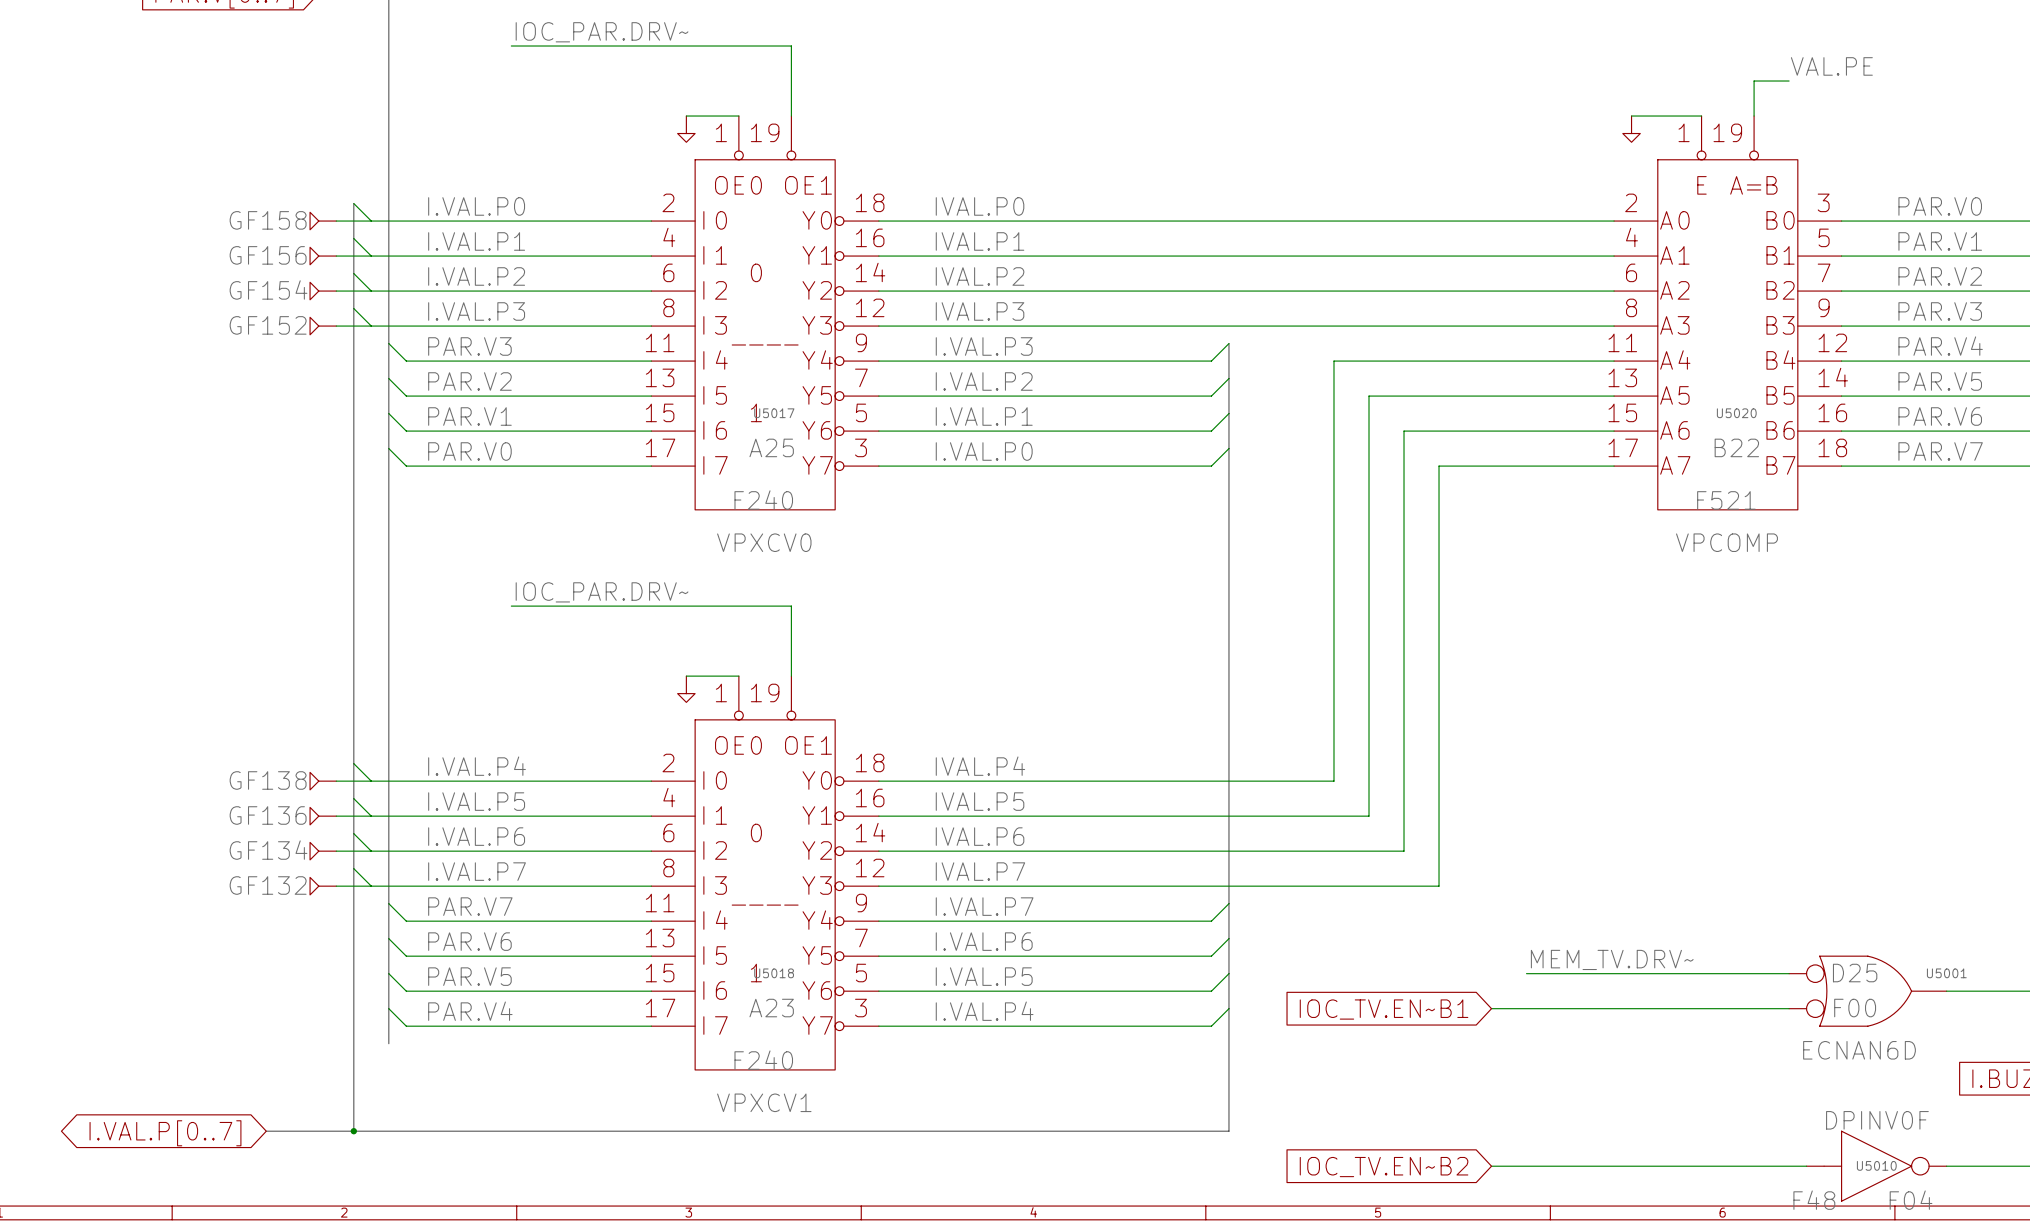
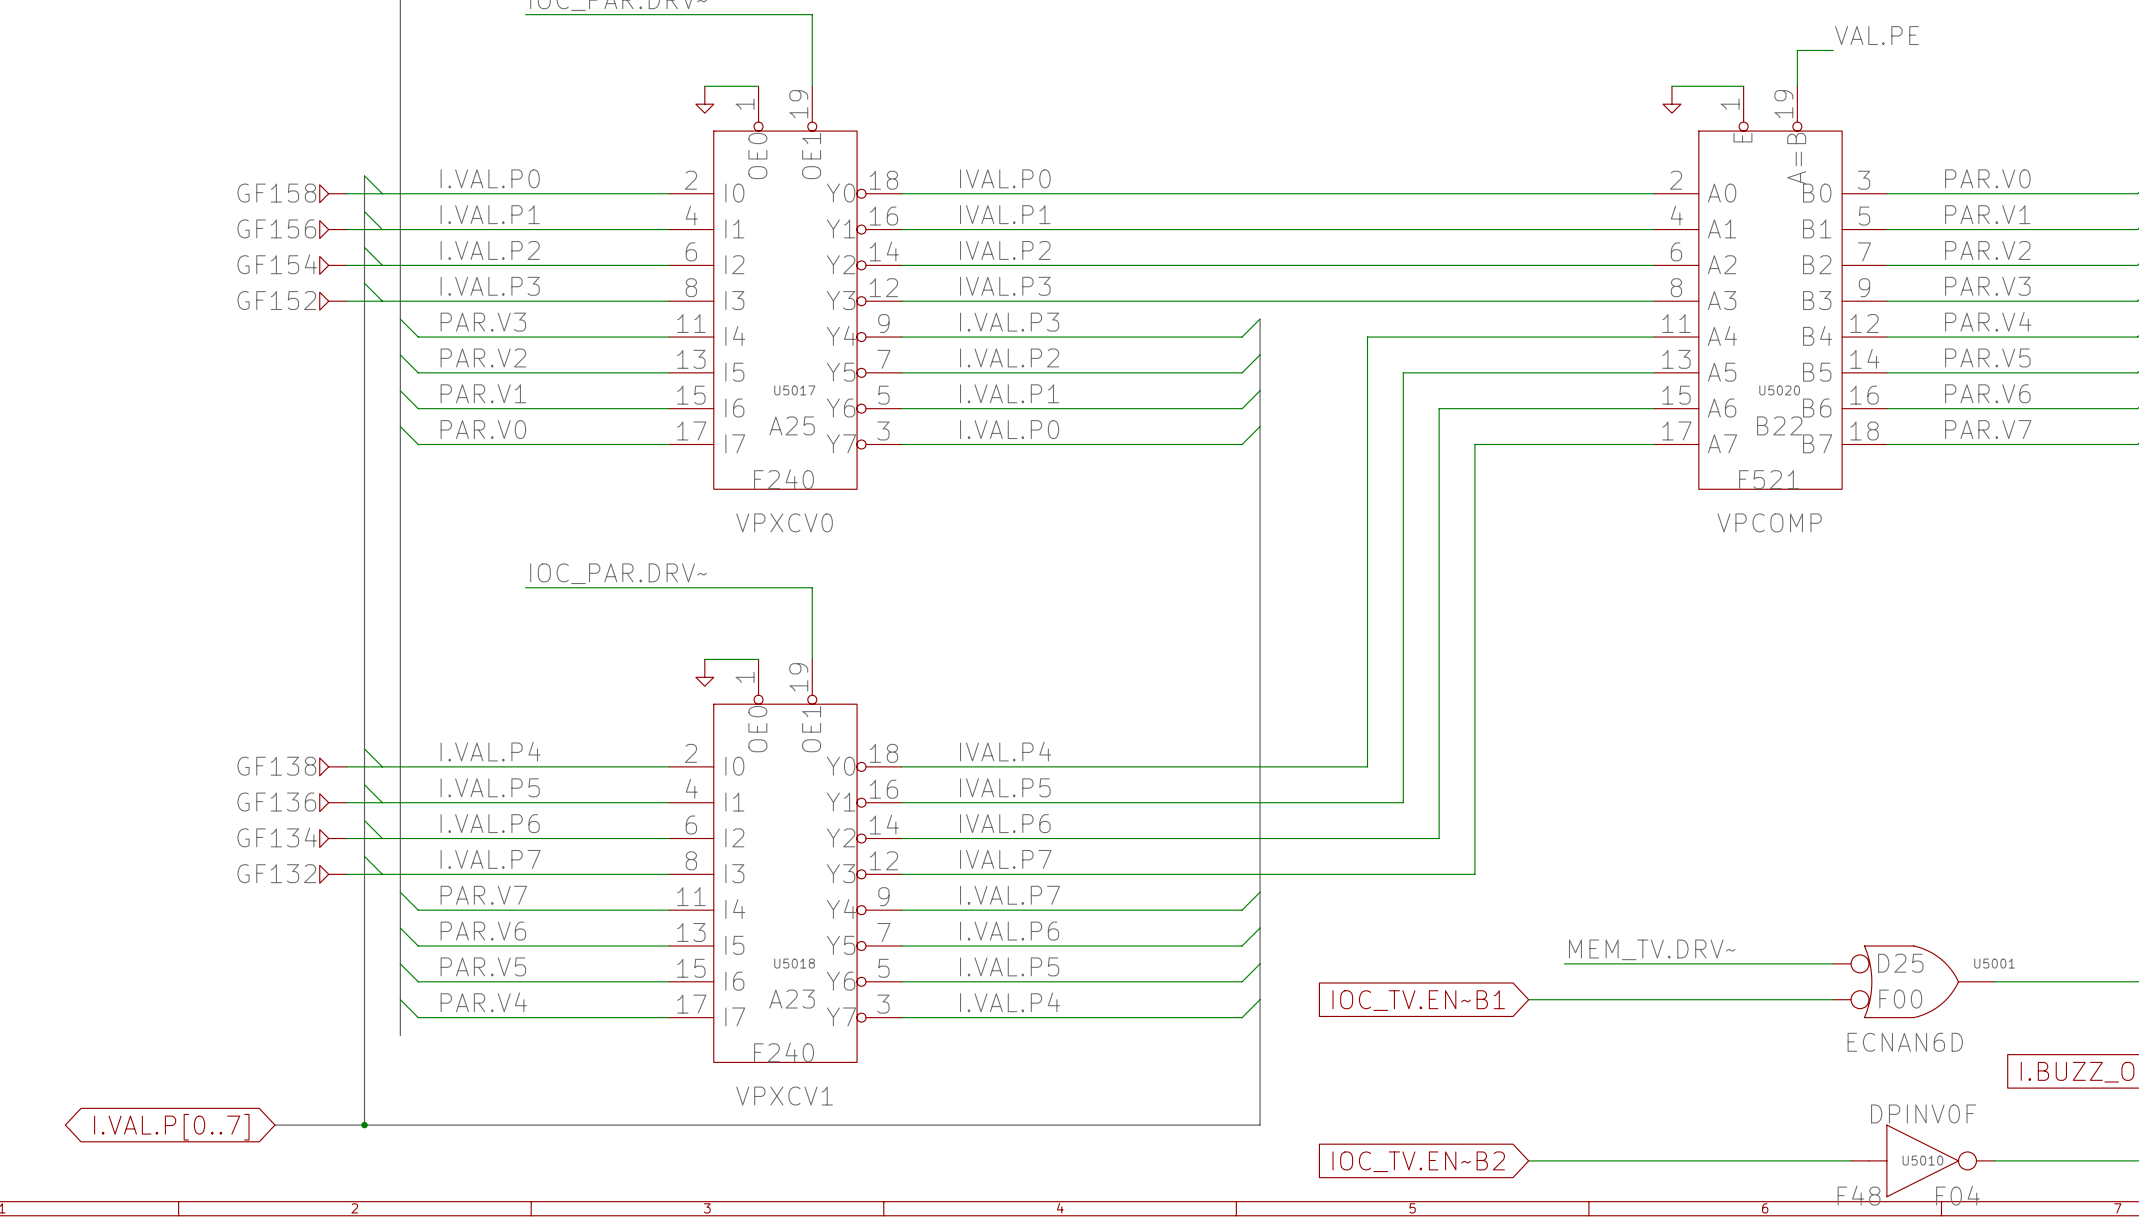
U5017 symbol: [651, 116, 879, 510] -> [668, 86, 902, 490]
U5020 symbol: [1614, 116, 1842, 510] -> [1654, 86, 1887, 490]
U5018 symbol: [651, 676, 879, 1070] -> [668, 659, 902, 1063]

